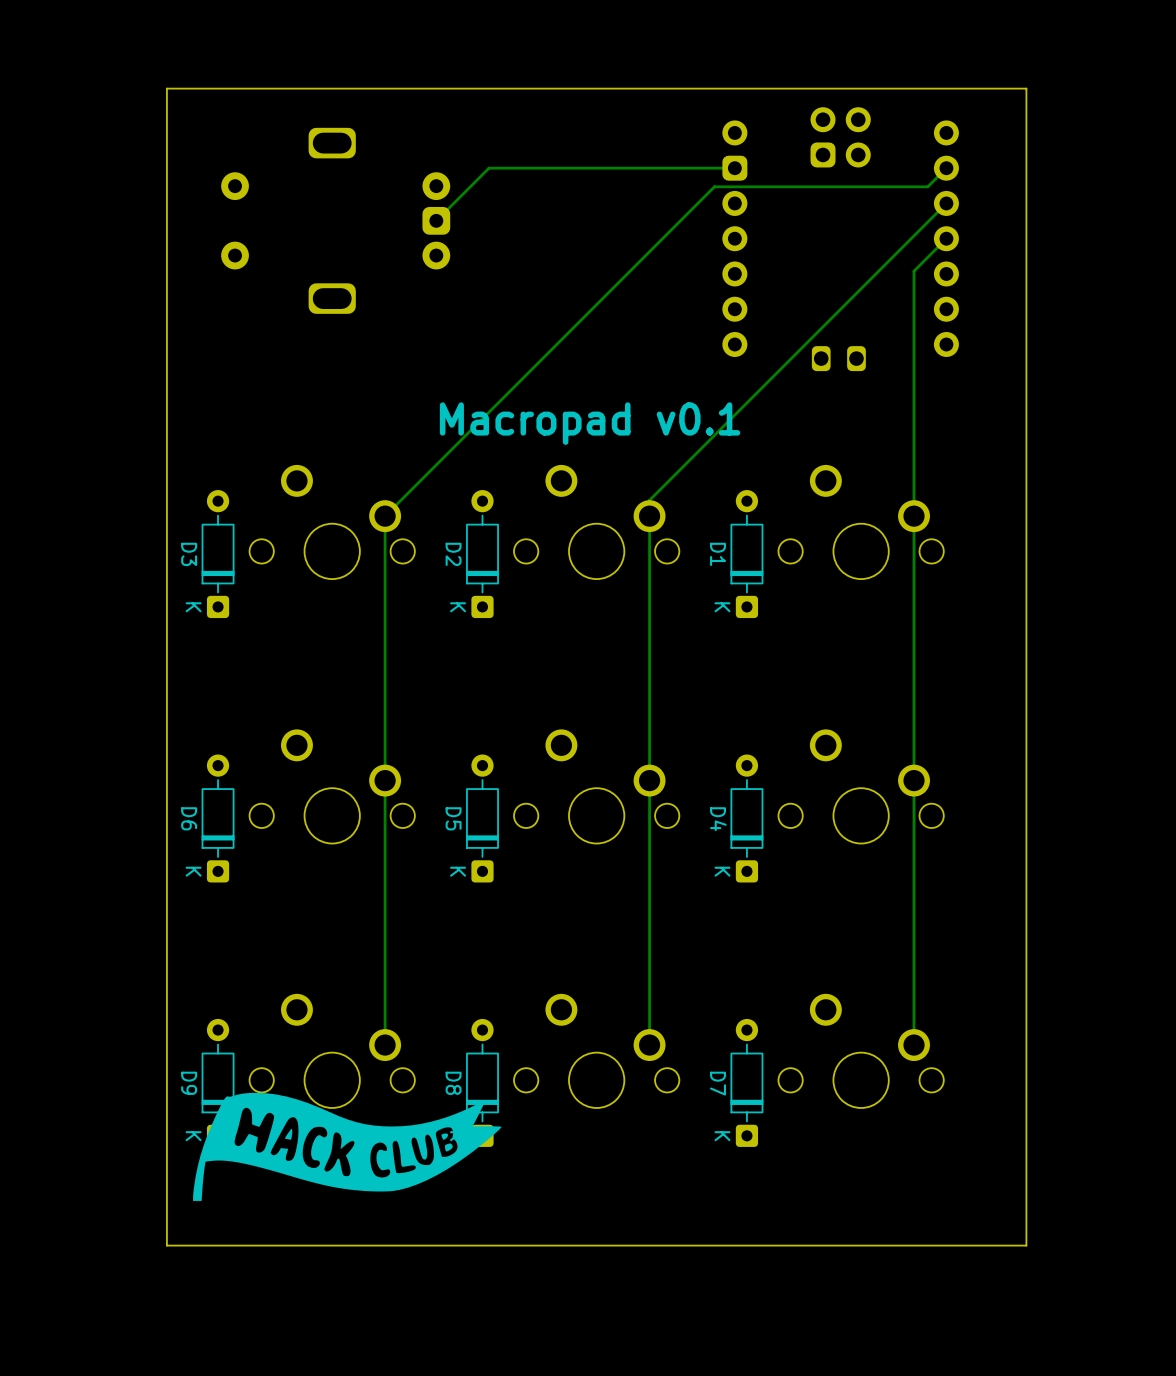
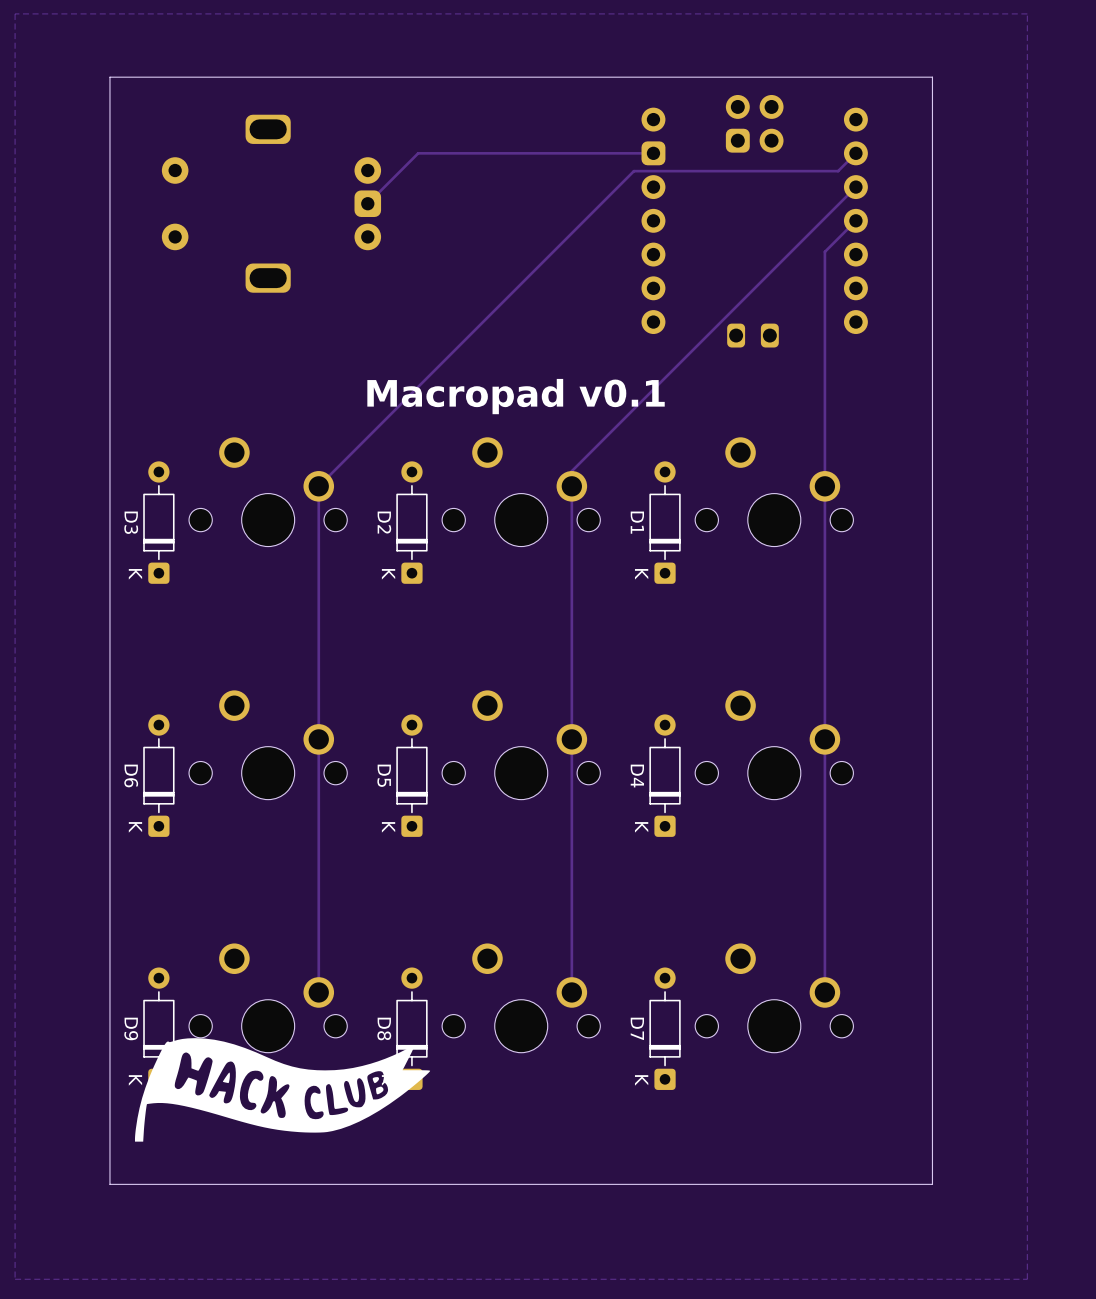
zone outline: none -> (1027, 13) (15, 13) (15, 1279) (1027, 1279) (1027, 13)

